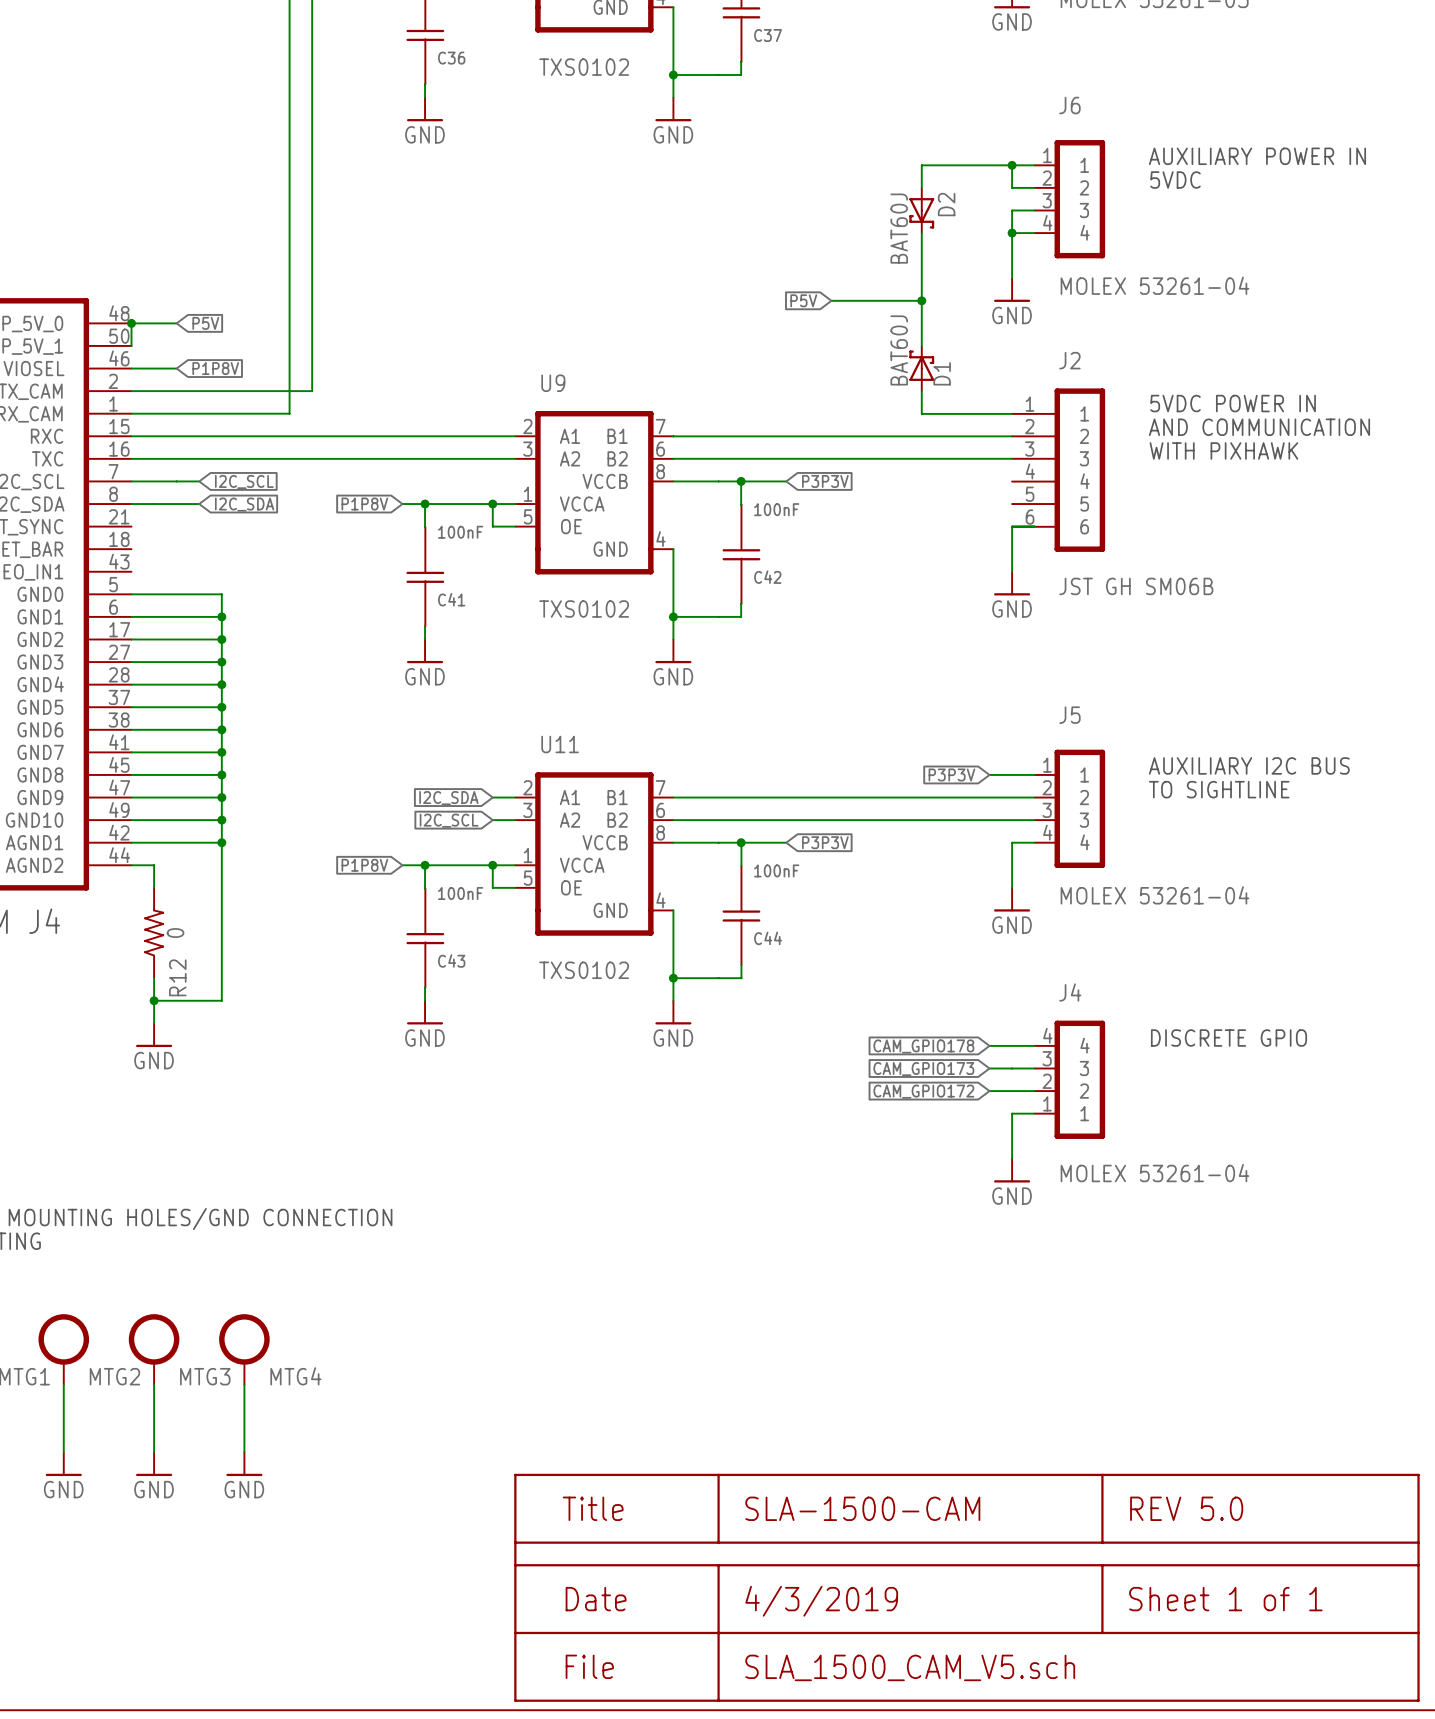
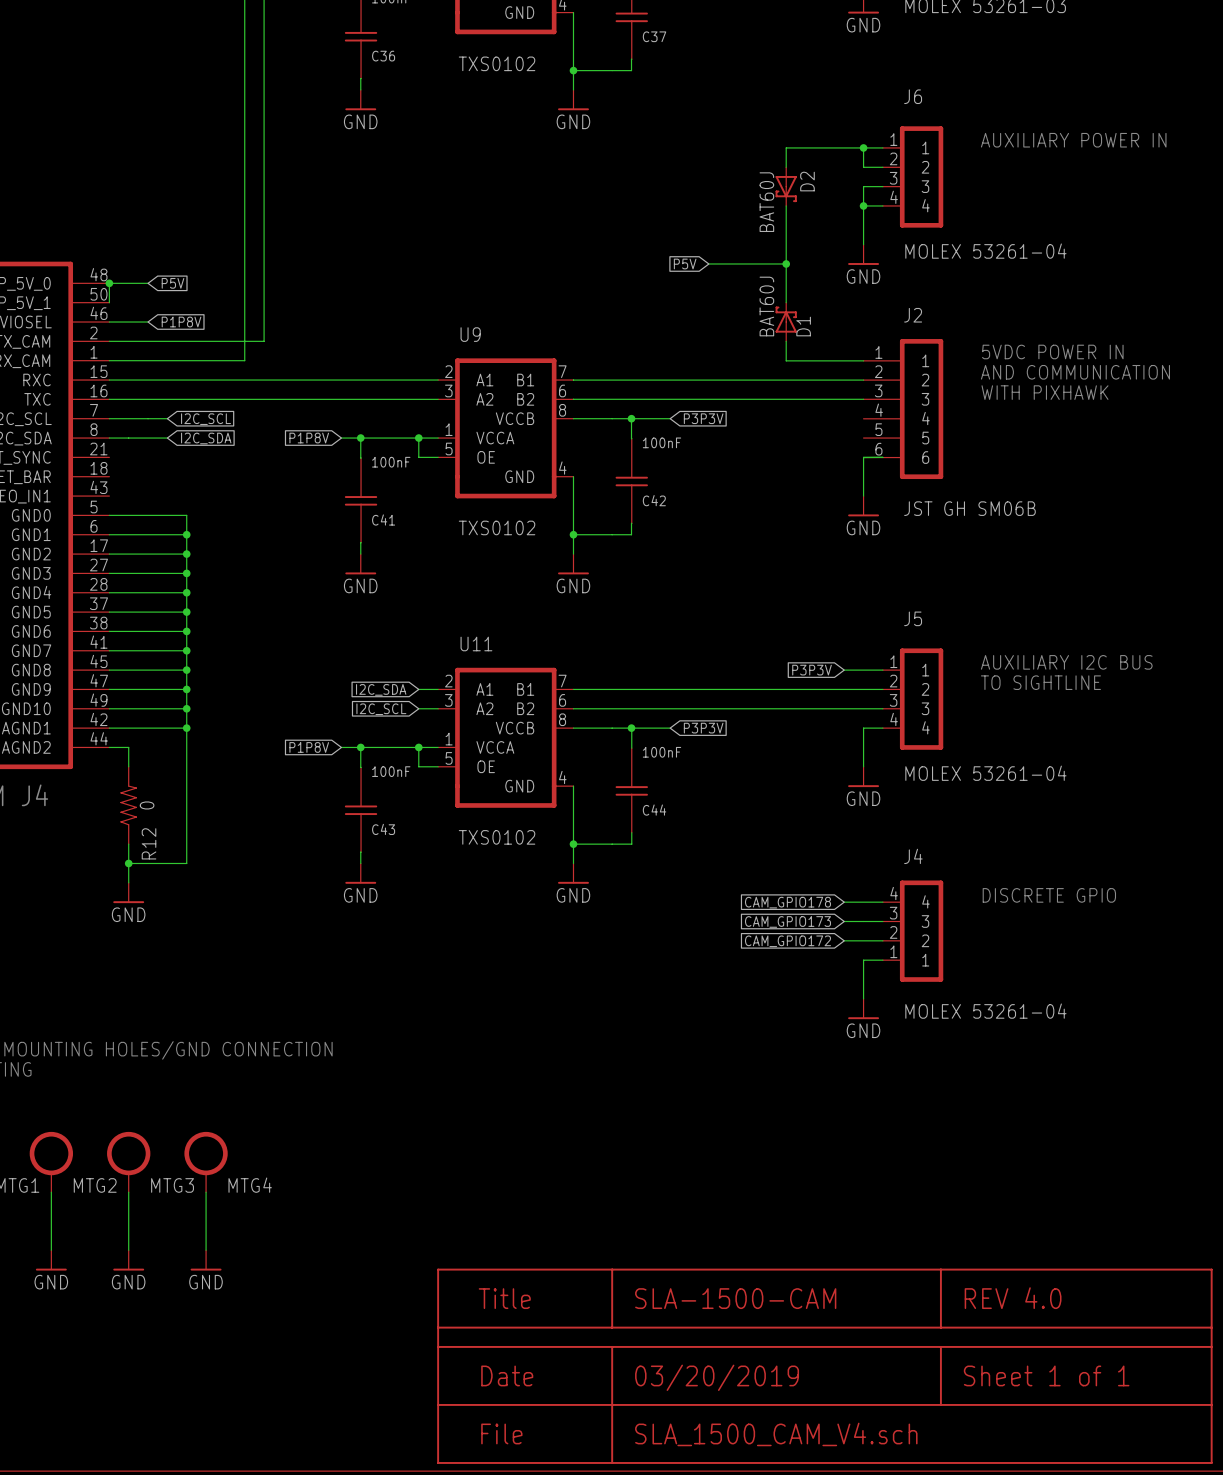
text: 5VDC (1175, 180) -> none
part text: REV 5.0 (1186, 1508) -> REV 4.0 (1013, 1298)
part text: 4/3/2019 (821, 1601) -> 03/20/2019 (717, 1377)
part text: SLA_1500_CAM_V5.sch (910, 1667) -> SLA_1500_CAM_V4.sch (776, 1434)

